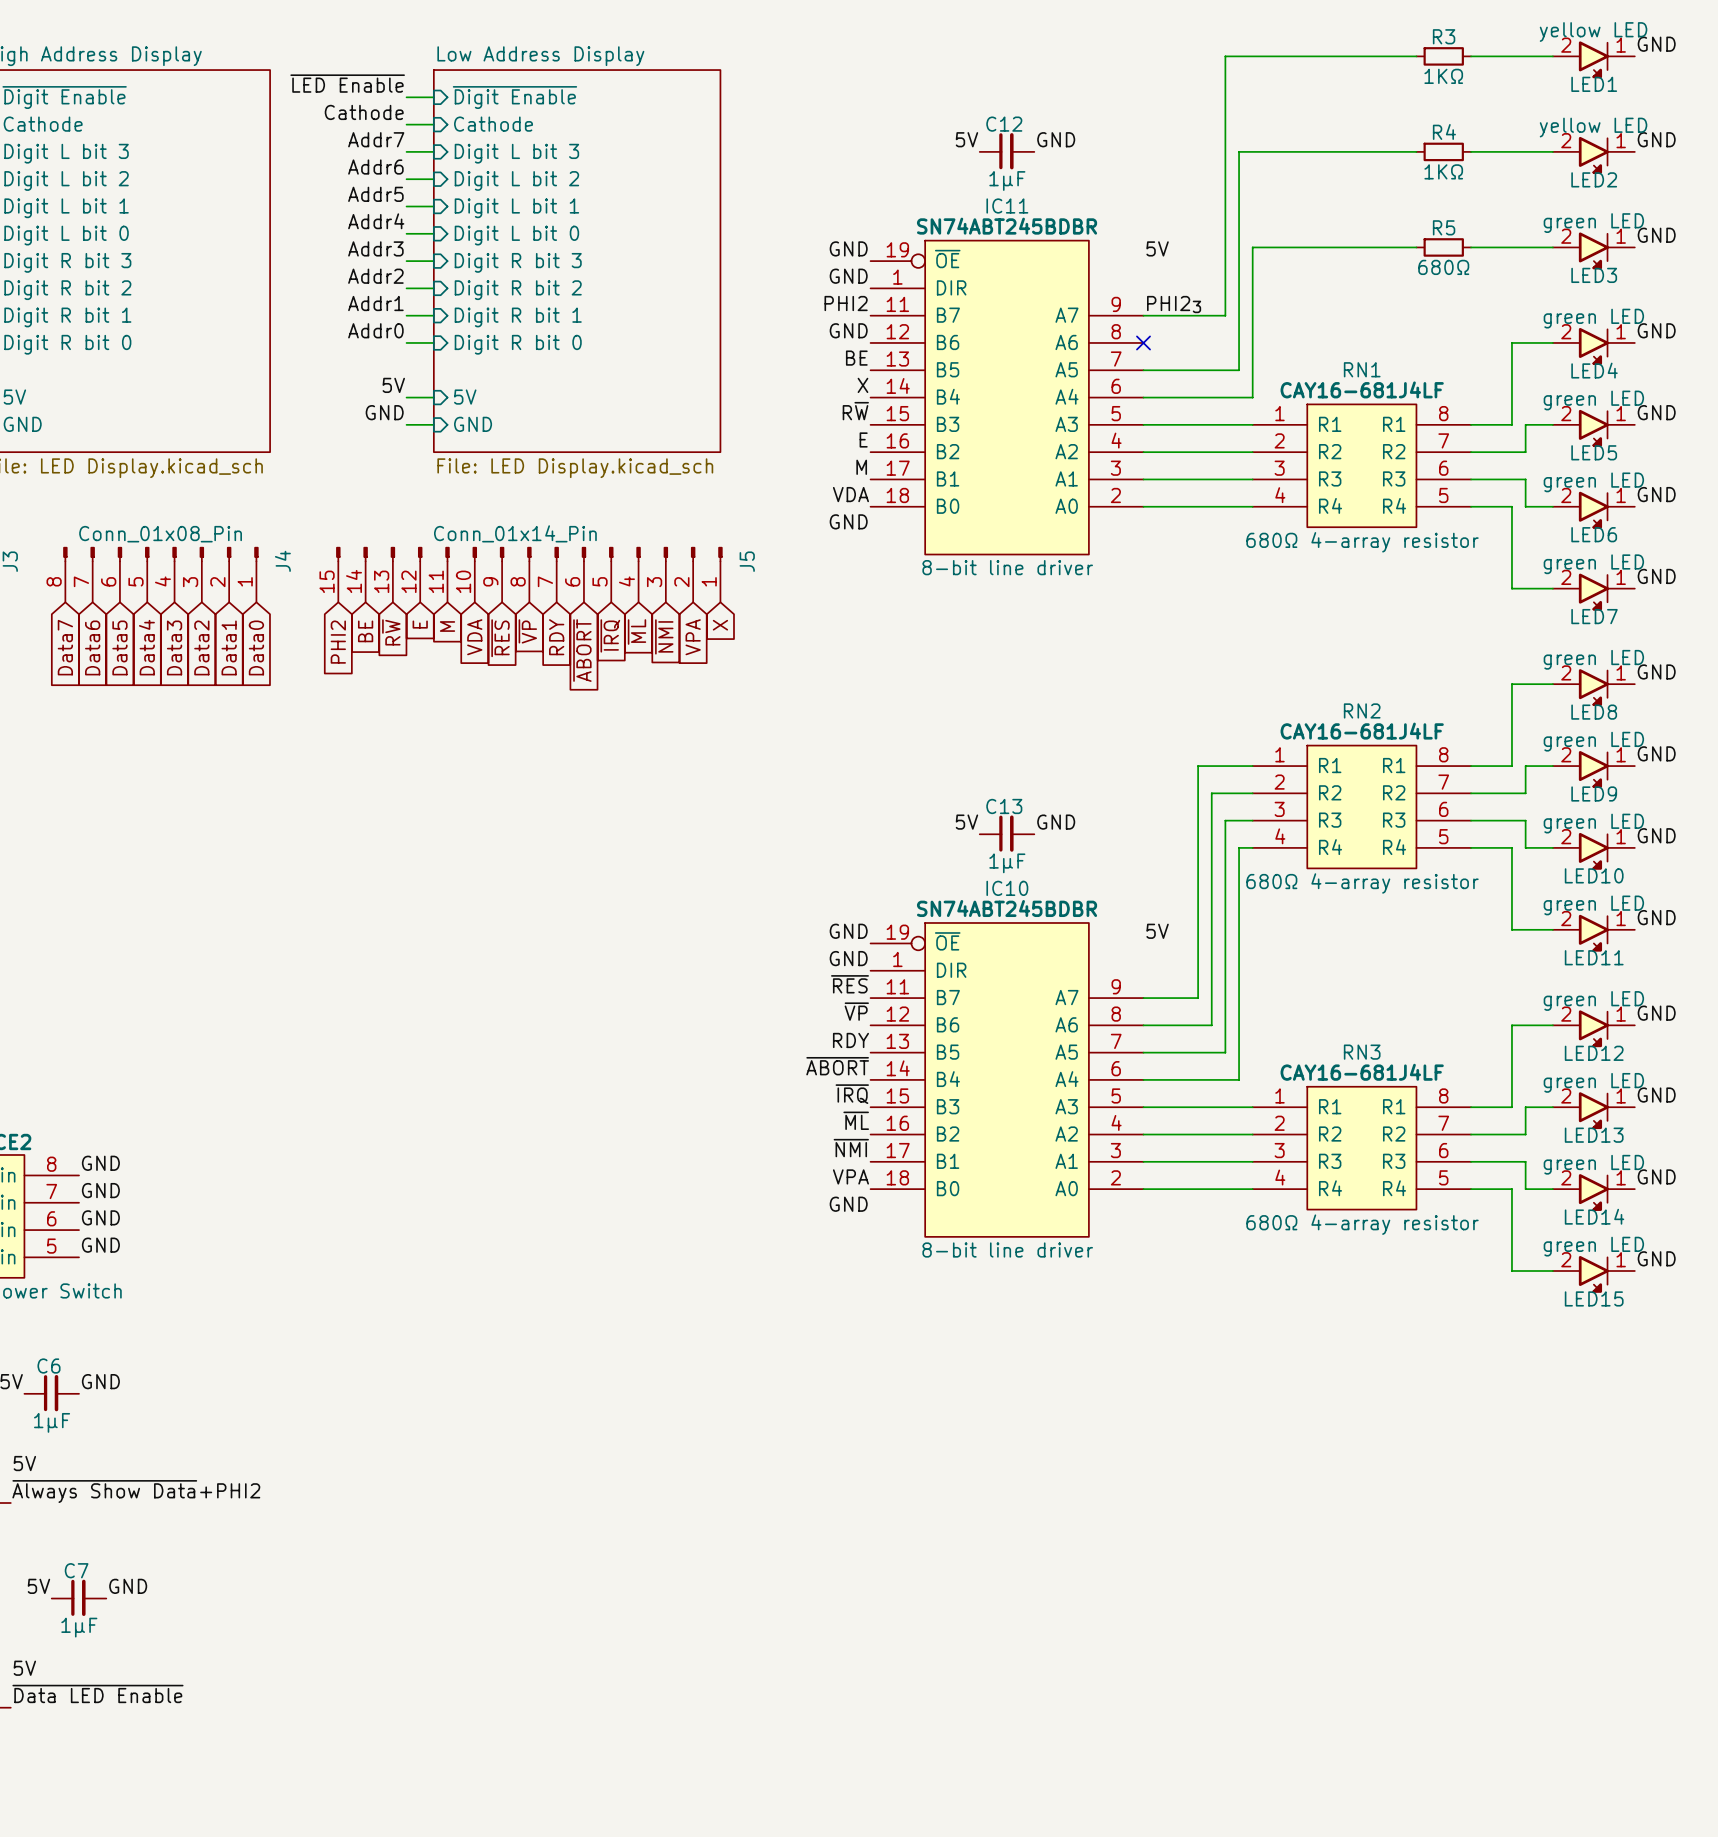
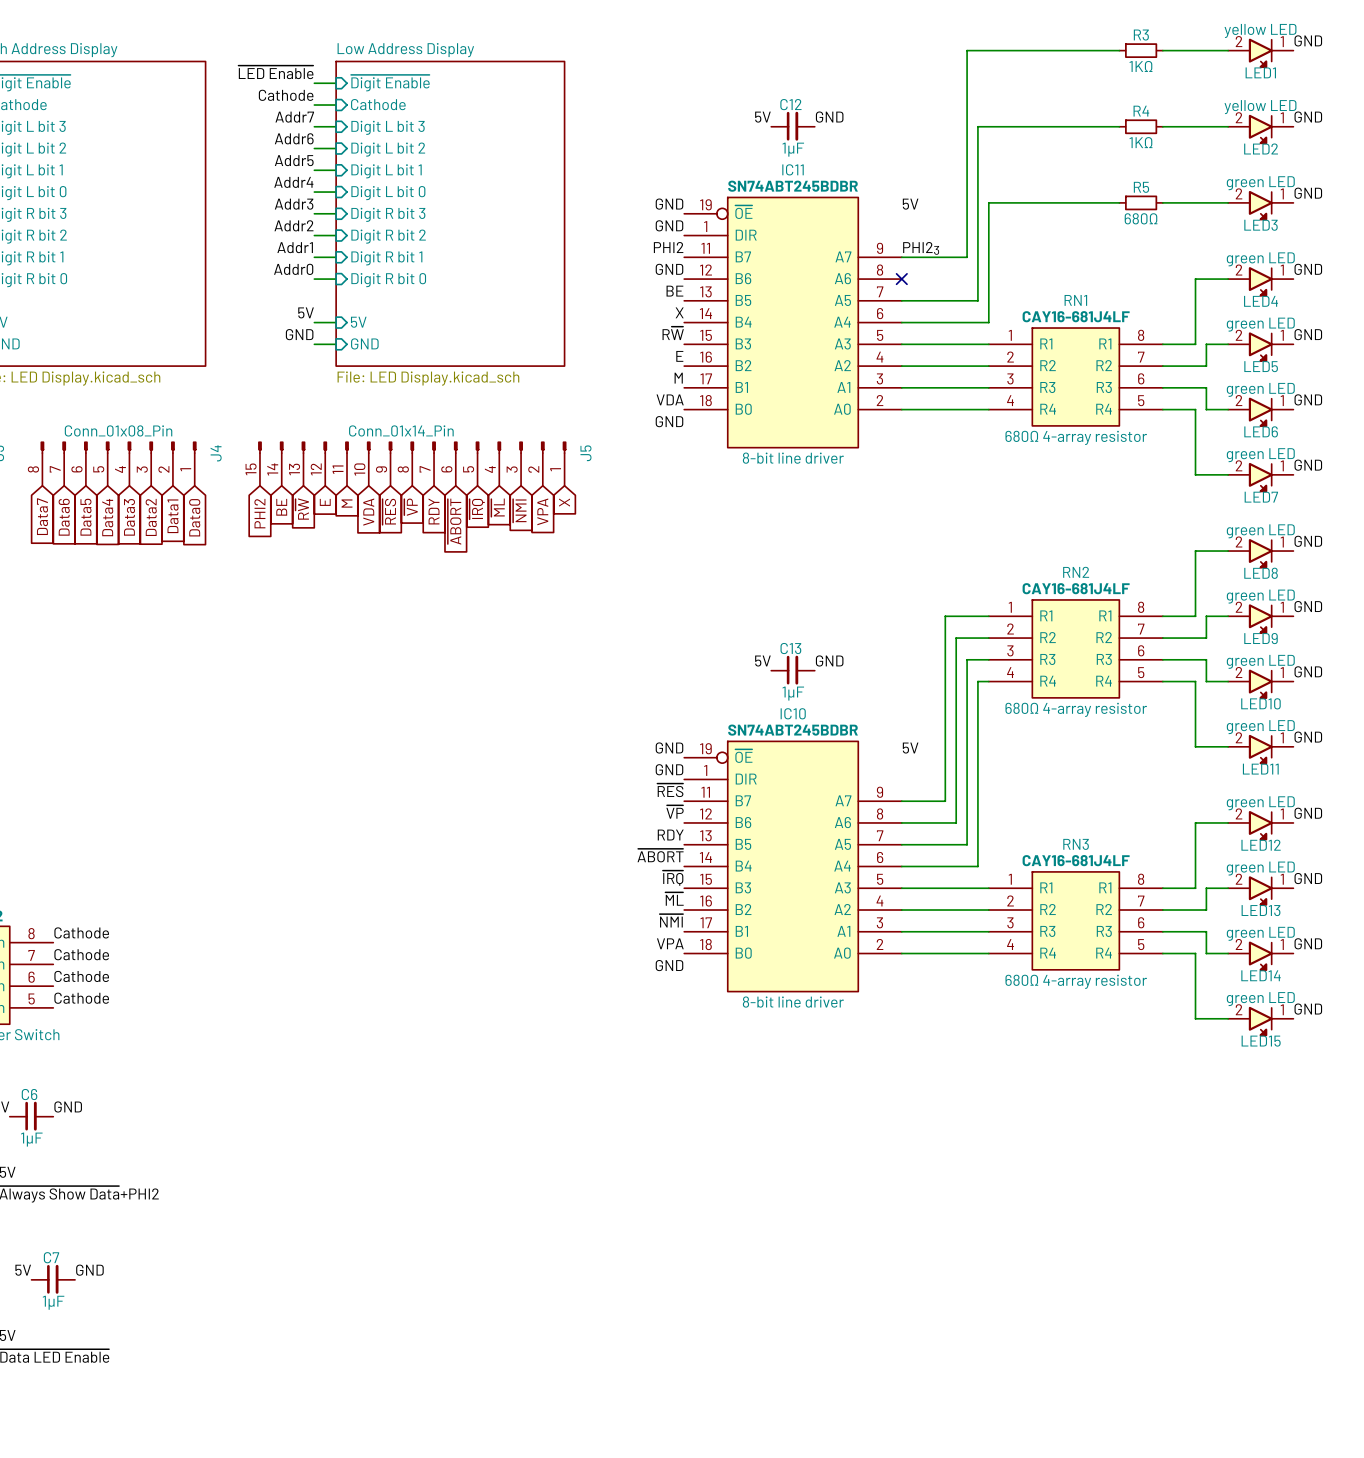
label: GND (100, 1163) -> Cathode (81, 932)
label: GND (100, 1190) -> Cathode (81, 954)
label: GND (100, 1217) -> Cathode (81, 976)
label: GND (100, 1245) -> Cathode (81, 998)

